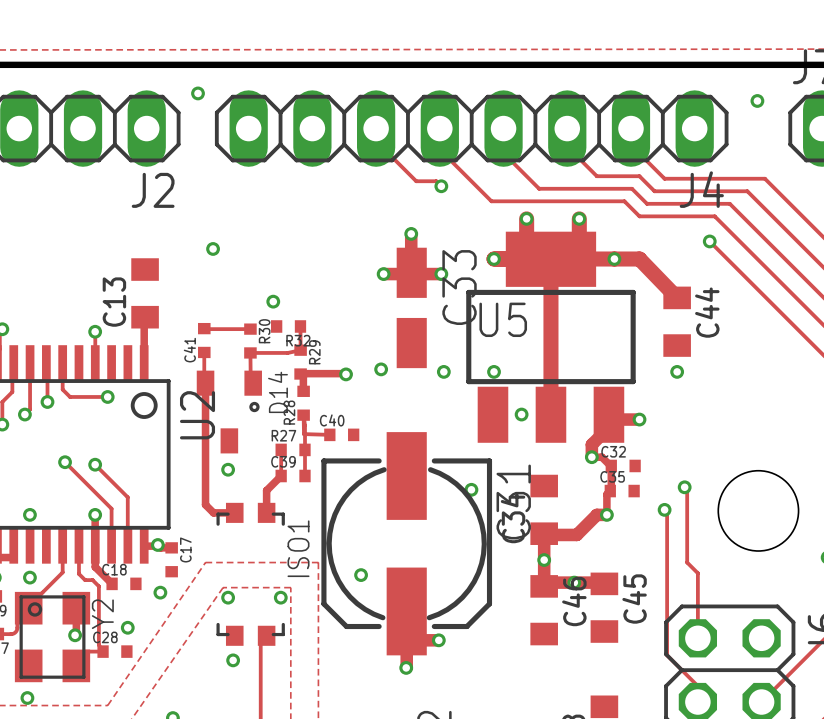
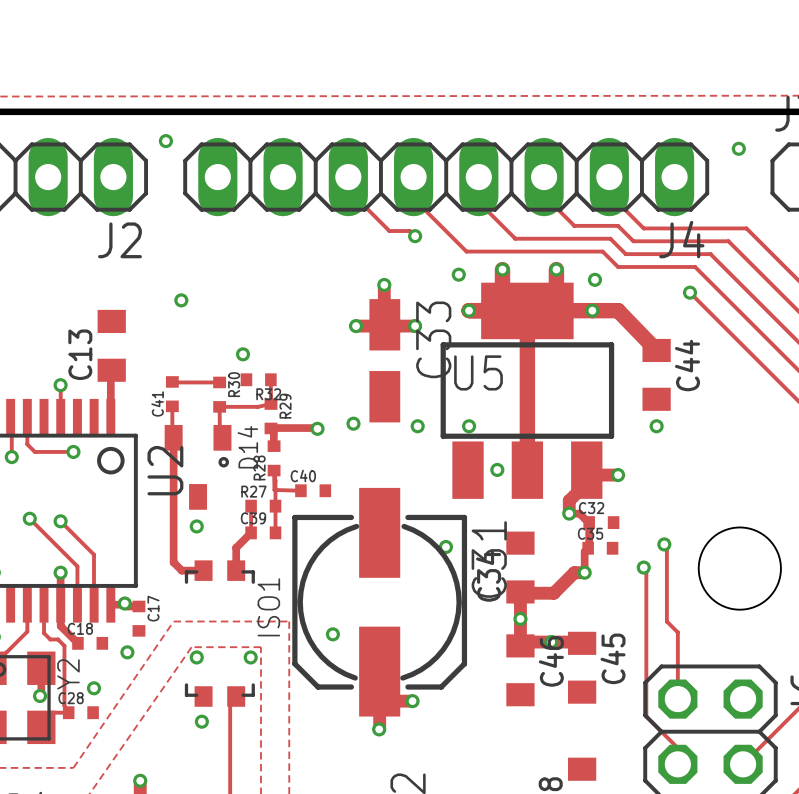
via: none -> (458, 274)
via: none -> (594, 279)

